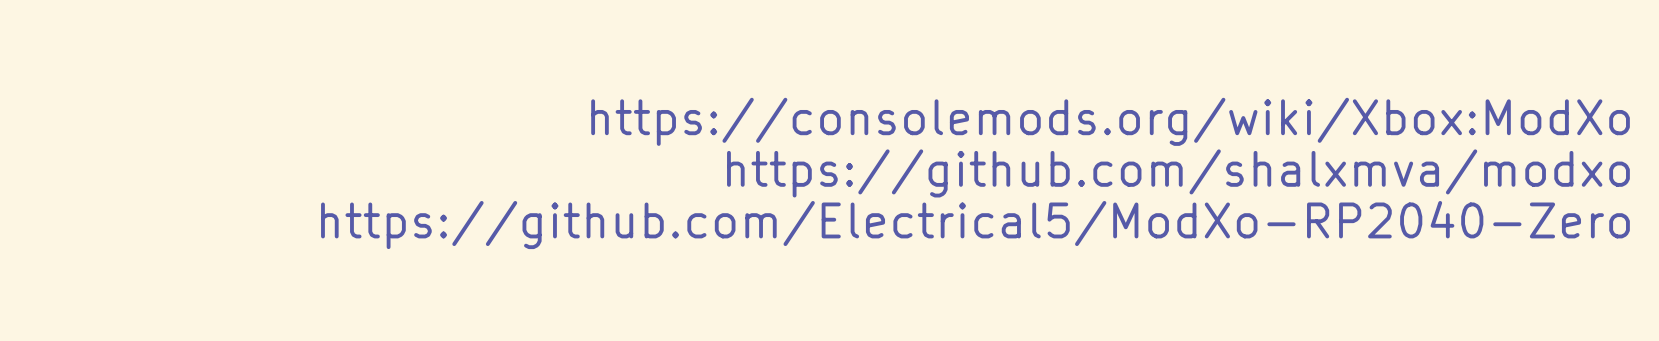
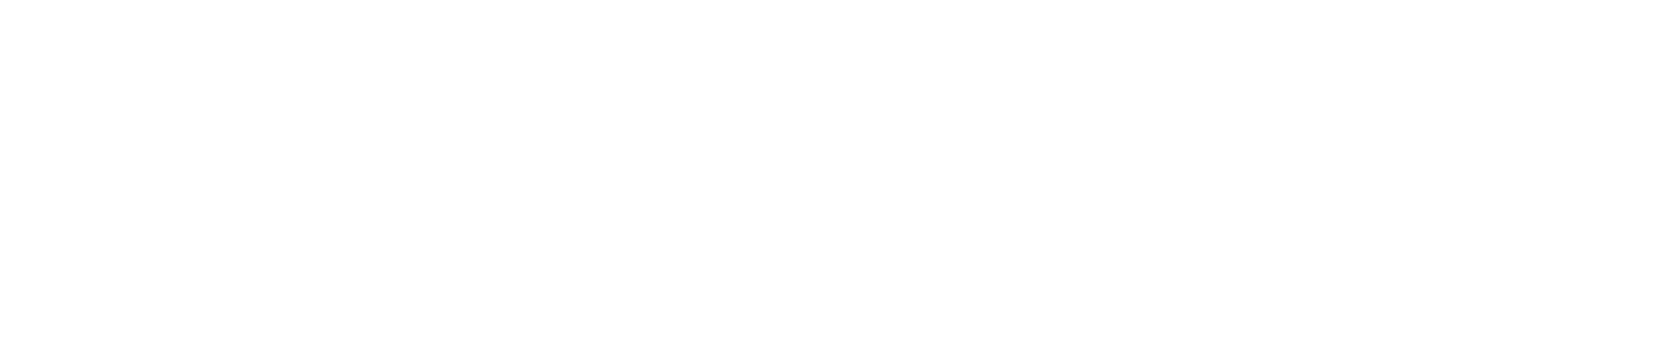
text: https://consolemods.org/wiki/Xbox:ModXo (1110, 121) -> none
text: https://github.com/shalxmva/modxo (1178, 173) -> none
text: https://github.com/Electrical5/ModXo-RP2040-Zero (975, 225) -> none

